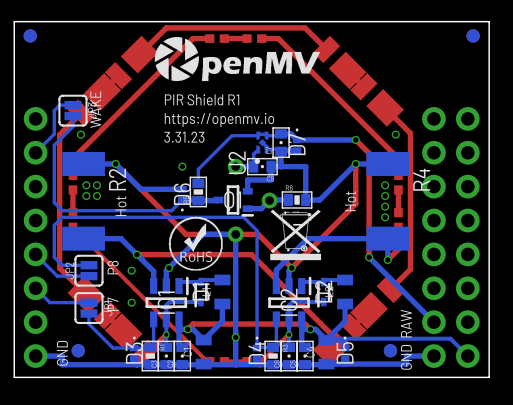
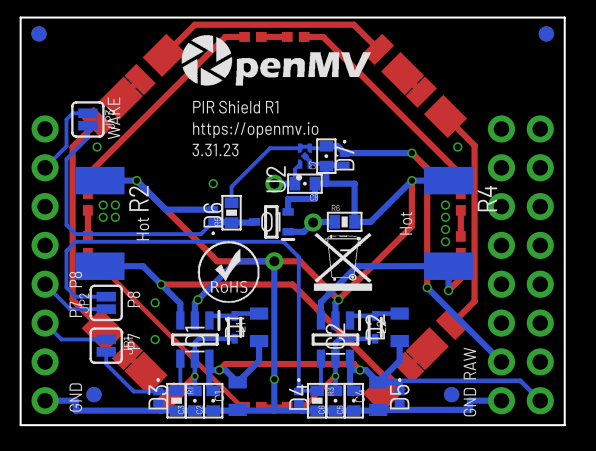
text: none -> P8 (75, 279)
text: none -> P7 (75, 309)

